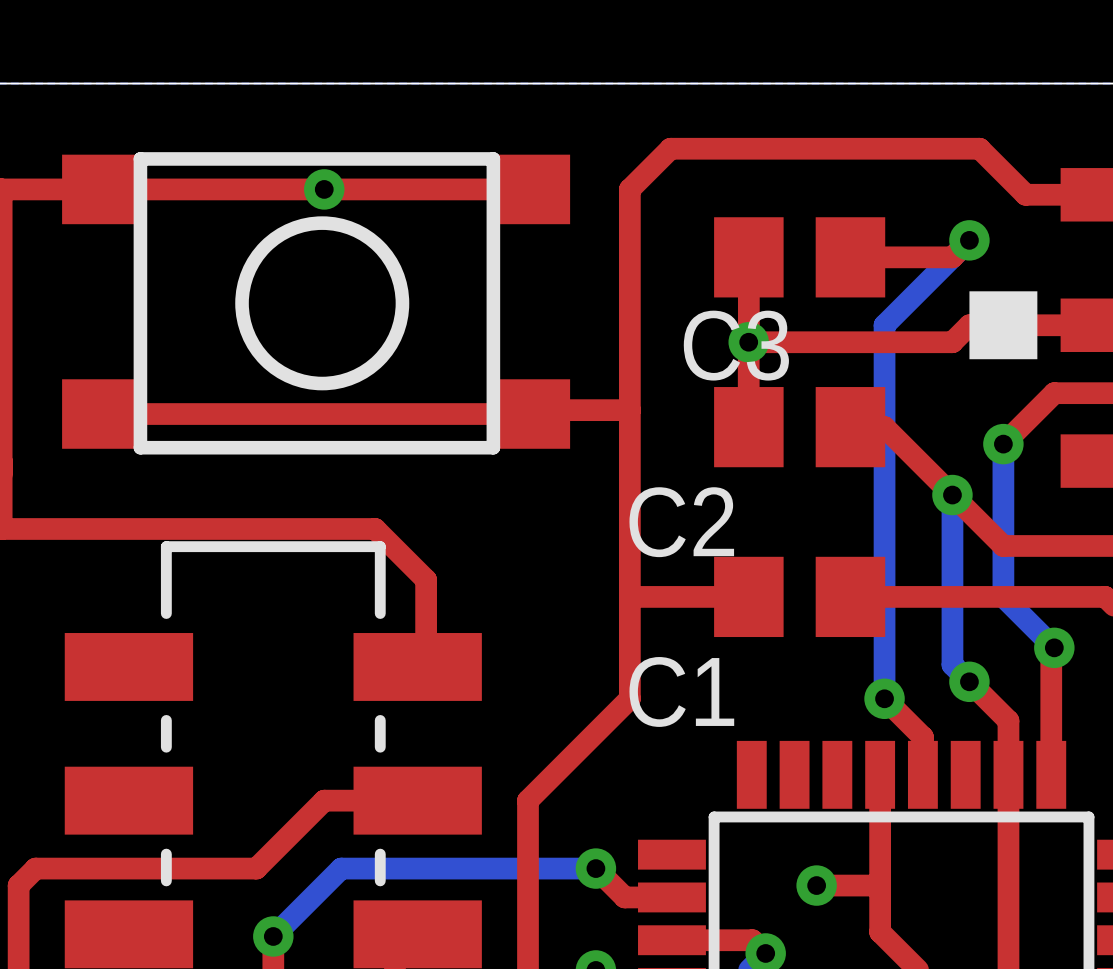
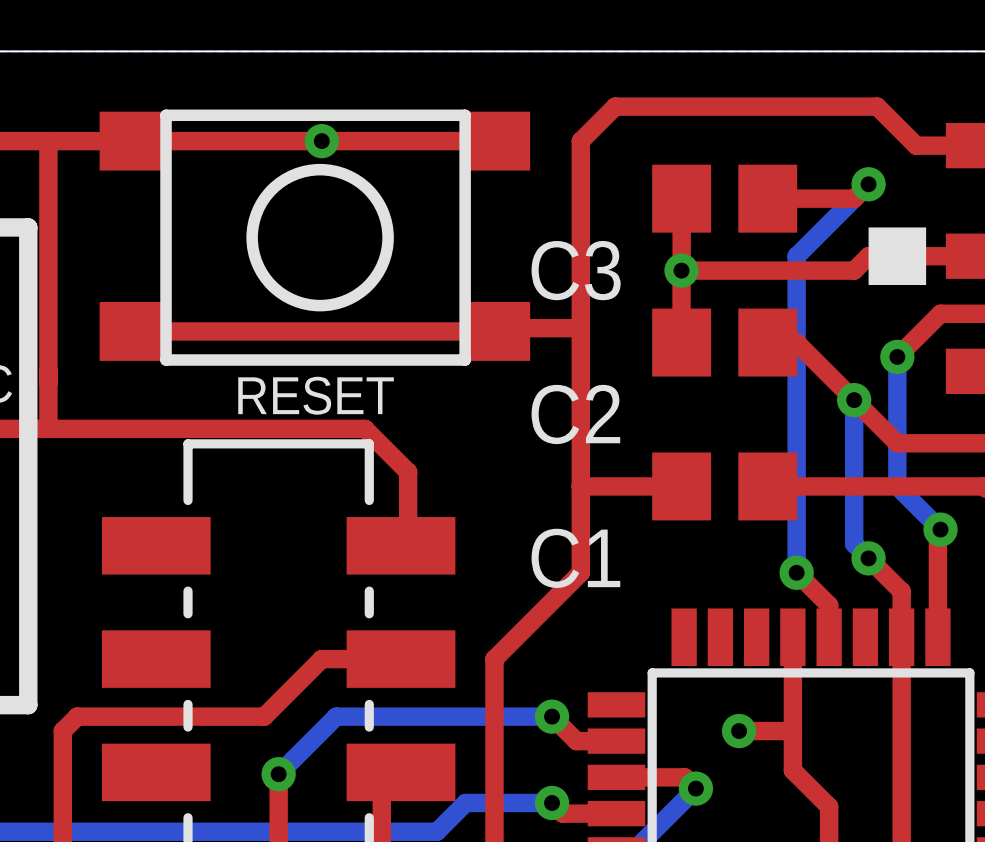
C3 name position: C3 (736, 345) -> C3 (576, 270)
text: none -> RESET (316, 395)
C2 name position: C2 (681, 522) -> C2 (575, 414)
C1 name position: C1 (681, 691) -> C1 (575, 558)

